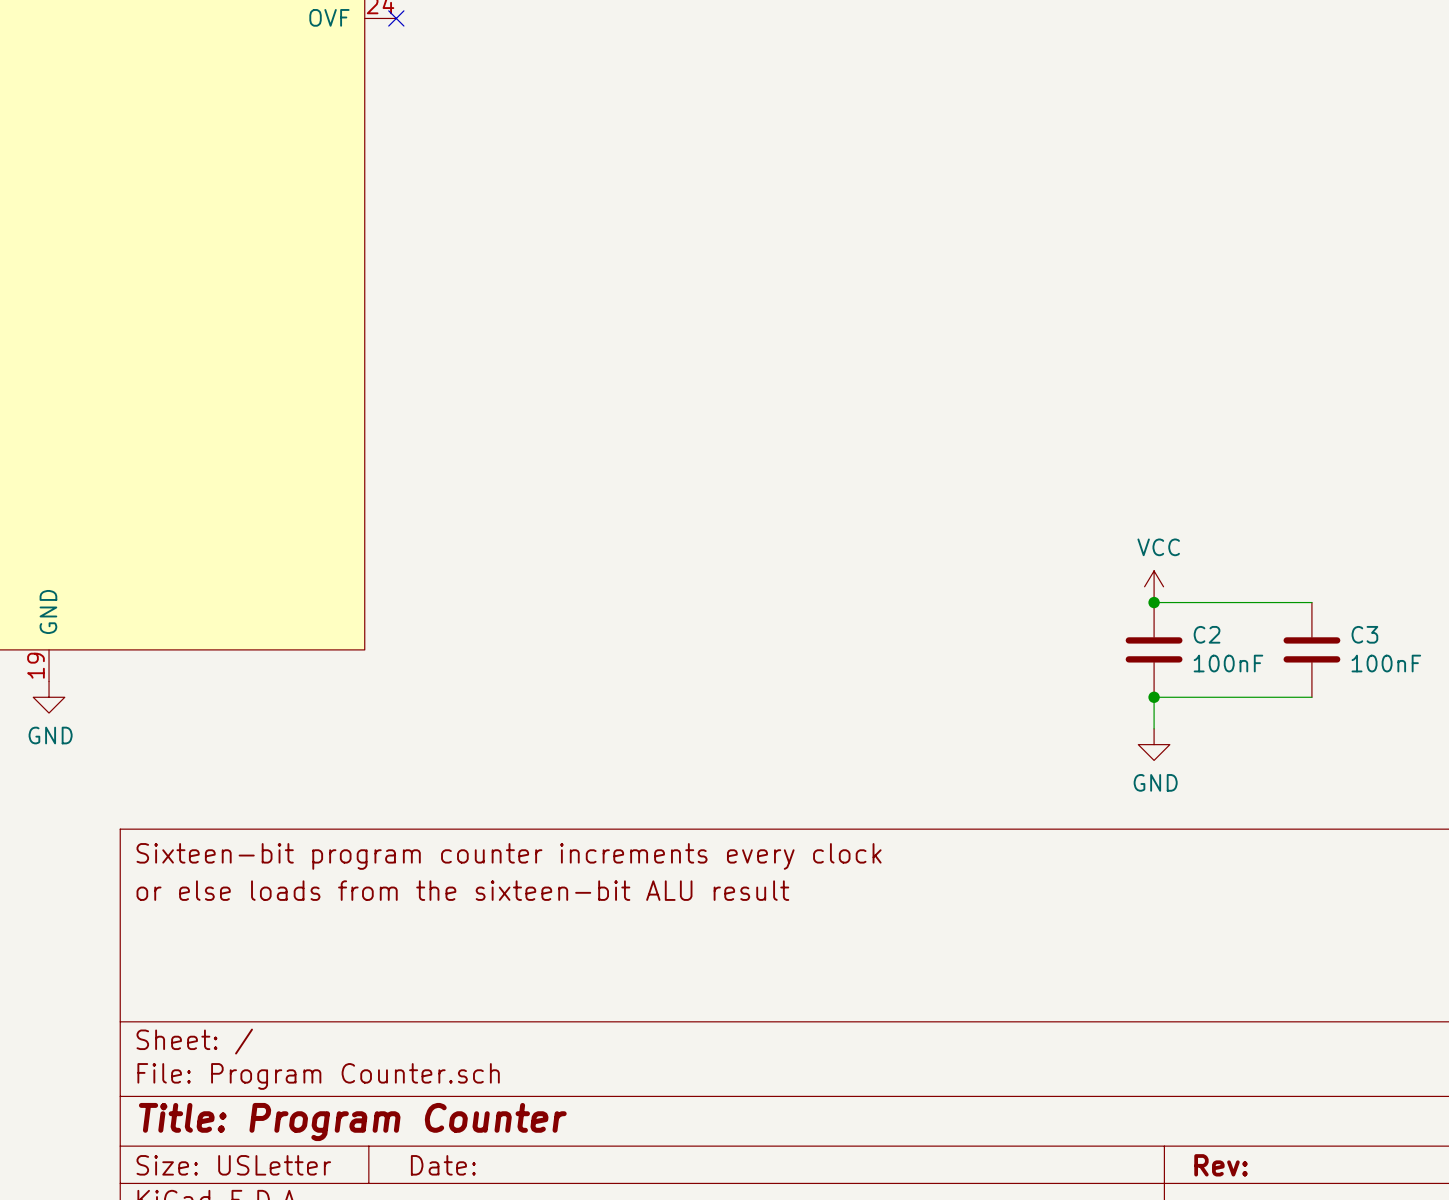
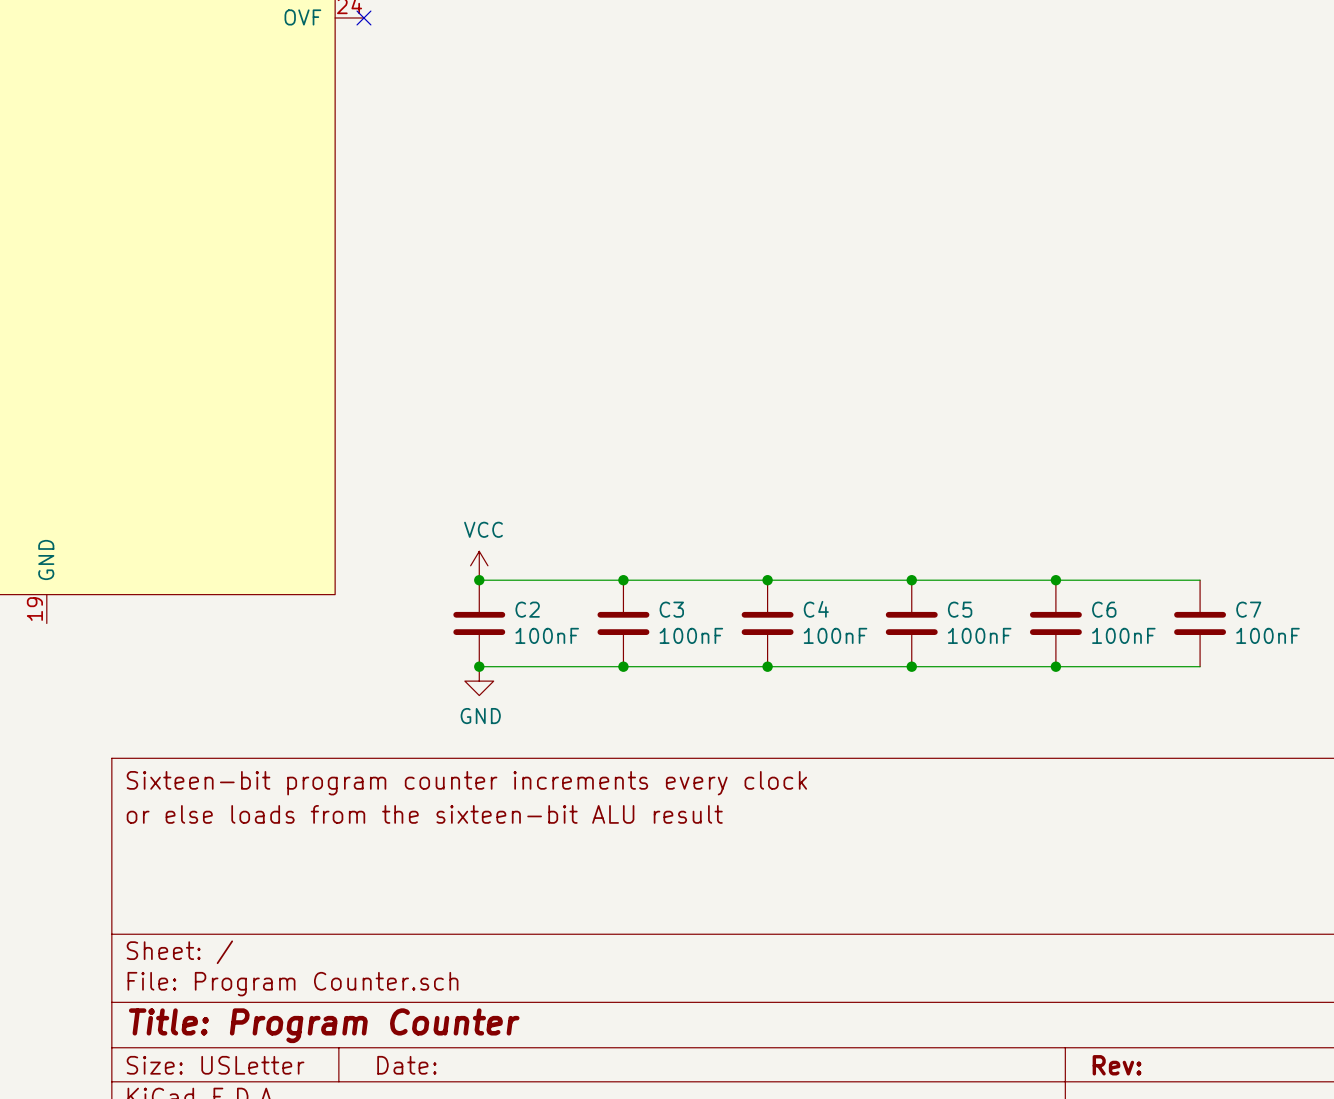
power symbol: VCC (1154, 586) -> none
wire: (1154, 602) (1311, 602) -> none
junction: (1154, 602) -> none
power symbol: none -> VCC (479, 565)
wire: none -> (479, 580) (1200, 580)
junction: none -> (479, 580)
junction: none -> (623, 580)
junction: none -> (767, 580)
junction: none -> (911, 580)
junction: none -> (1055, 580)
C2 position: (1154, 649) -> (479, 623)
C3 position: (1311, 649) -> (623, 623)
C4: none -> 100nF (767, 623)
C5: none -> 100nF (911, 623)
C6: none -> 100nF (1055, 623)
C7: none -> 100nF (1200, 623)
power symbol: GND (49, 697) -> none
junction: (1154, 697) -> none
wire: (1311, 697) (1154, 697) (1154, 728) -> none
wire: none -> (479, 666) (1200, 666)
junction: none -> (479, 666)
junction: none -> (623, 666)
junction: none -> (767, 666)
junction: none -> (911, 666)
junction: none -> (1055, 666)
power symbol: none -> GND (479, 681)
power symbol: GND (1154, 744) -> none

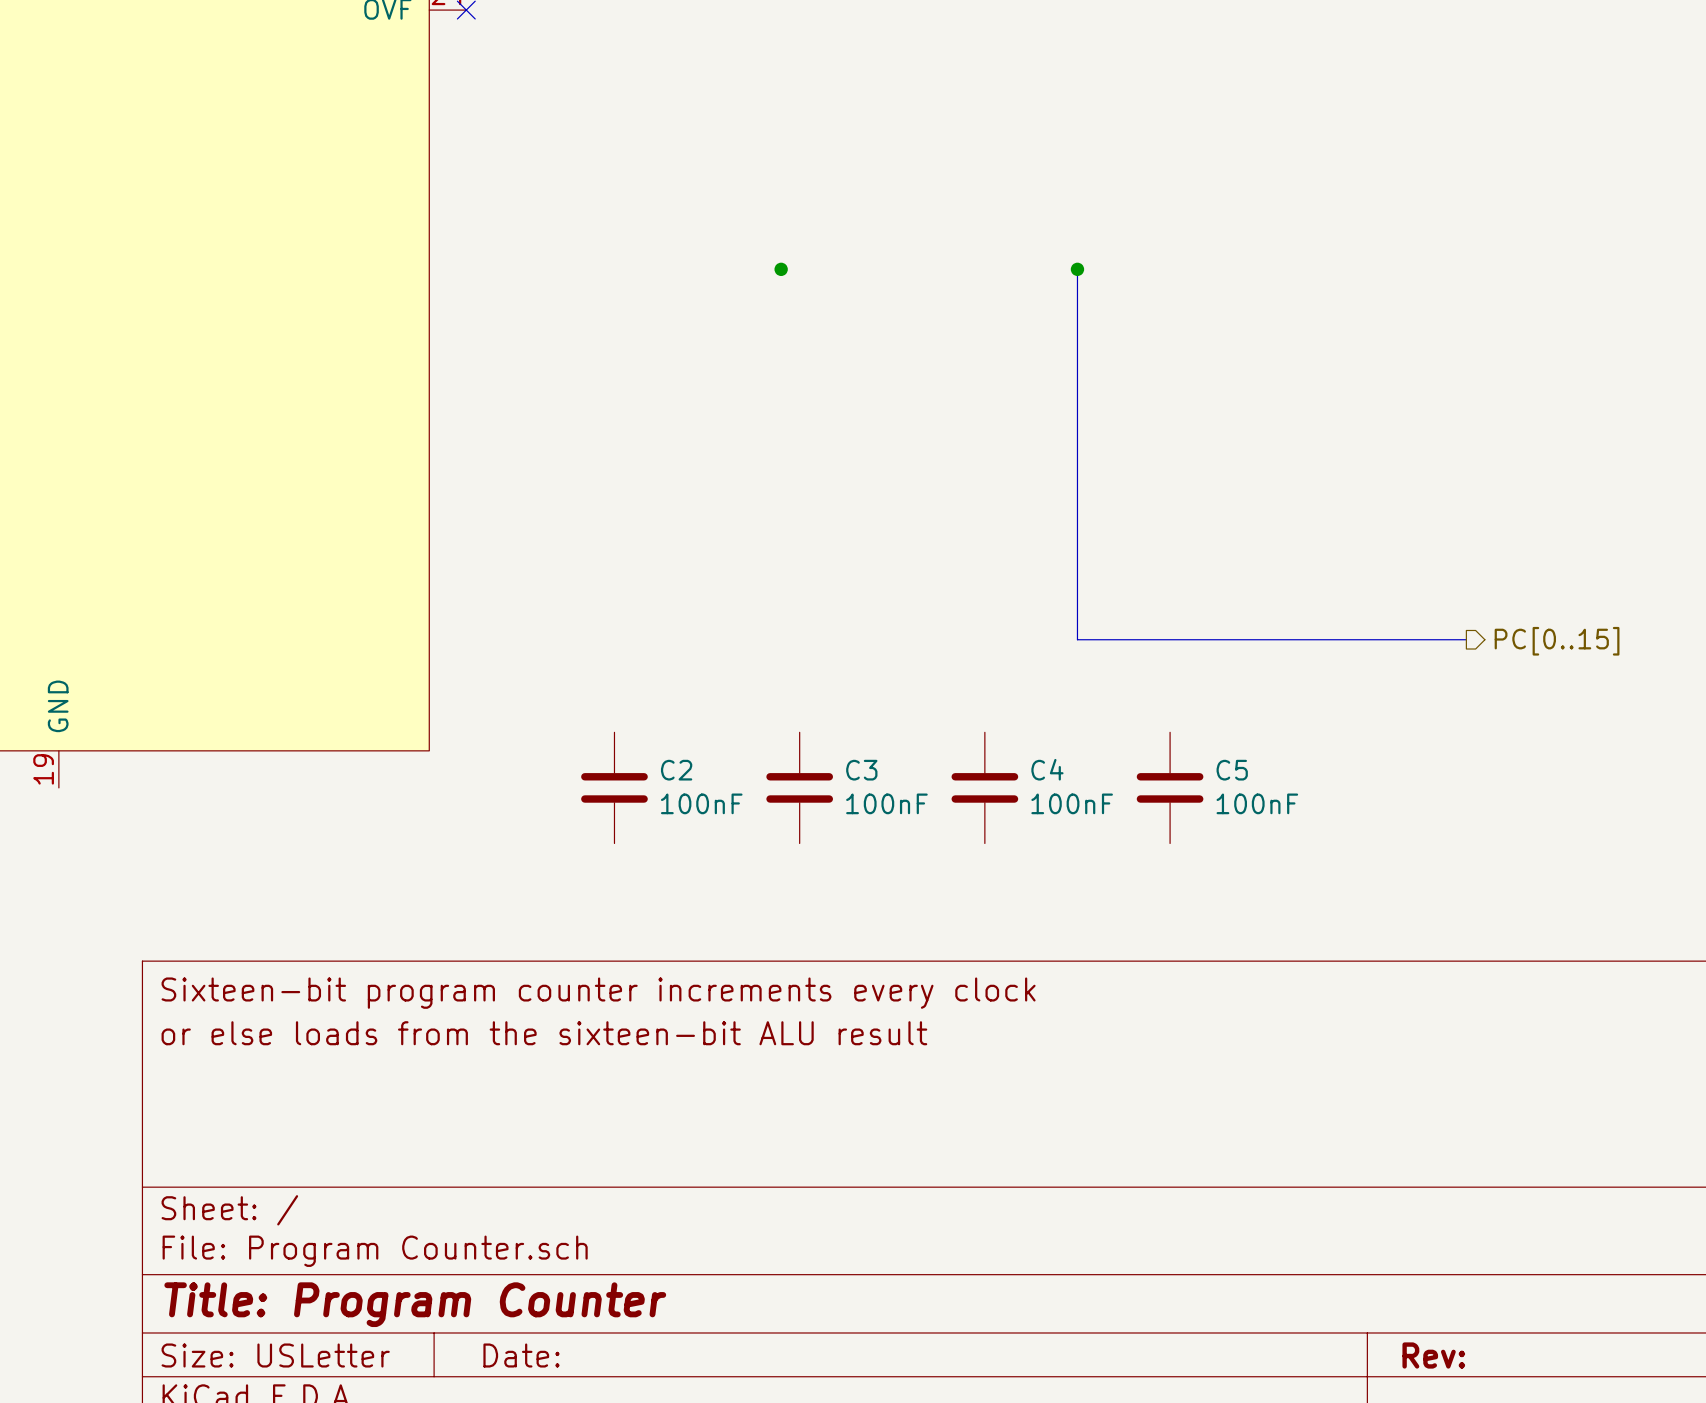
junction: none -> (781, 269)
bus: none -> (1077, 269) (1077, 639) (1466, 639)
junction: none -> (1077, 269)
hierarchical label: none -> PC[0..15] (1557, 641)
power symbol: VCC (479, 565) -> none
wire: (479, 580) (1200, 580) -> none
junction: (479, 580) -> none
junction: (623, 580) -> none
junction: (767, 580) -> none
junction: (911, 580) -> none
junction: (1055, 580) -> none
C6: 100nF (1055, 623) -> none
C7: 100nF (1200, 623) -> none
wire: (479, 666) (1200, 666) -> none
junction: (479, 666) -> none
junction: (623, 666) -> none
junction: (767, 666) -> none
junction: (911, 666) -> none
junction: (1055, 666) -> none
power symbol: GND (479, 681) -> none

